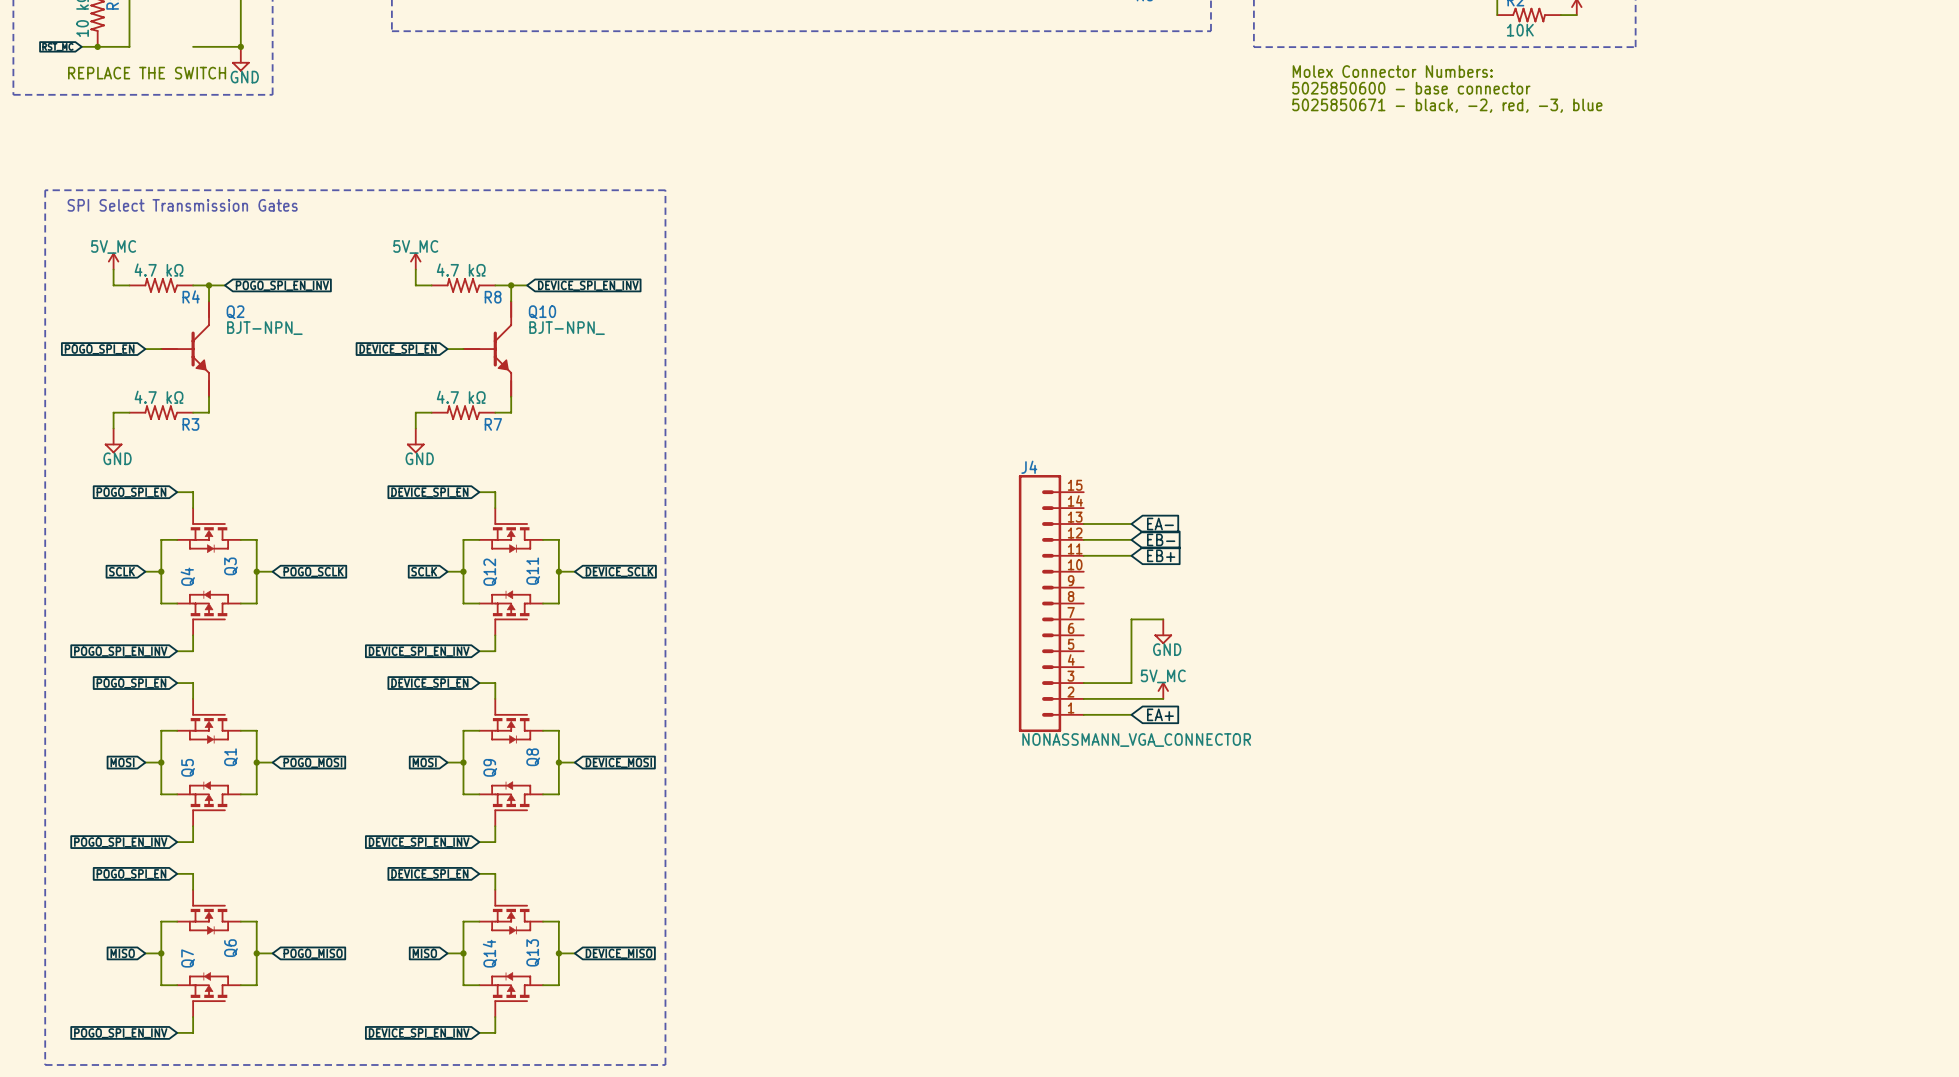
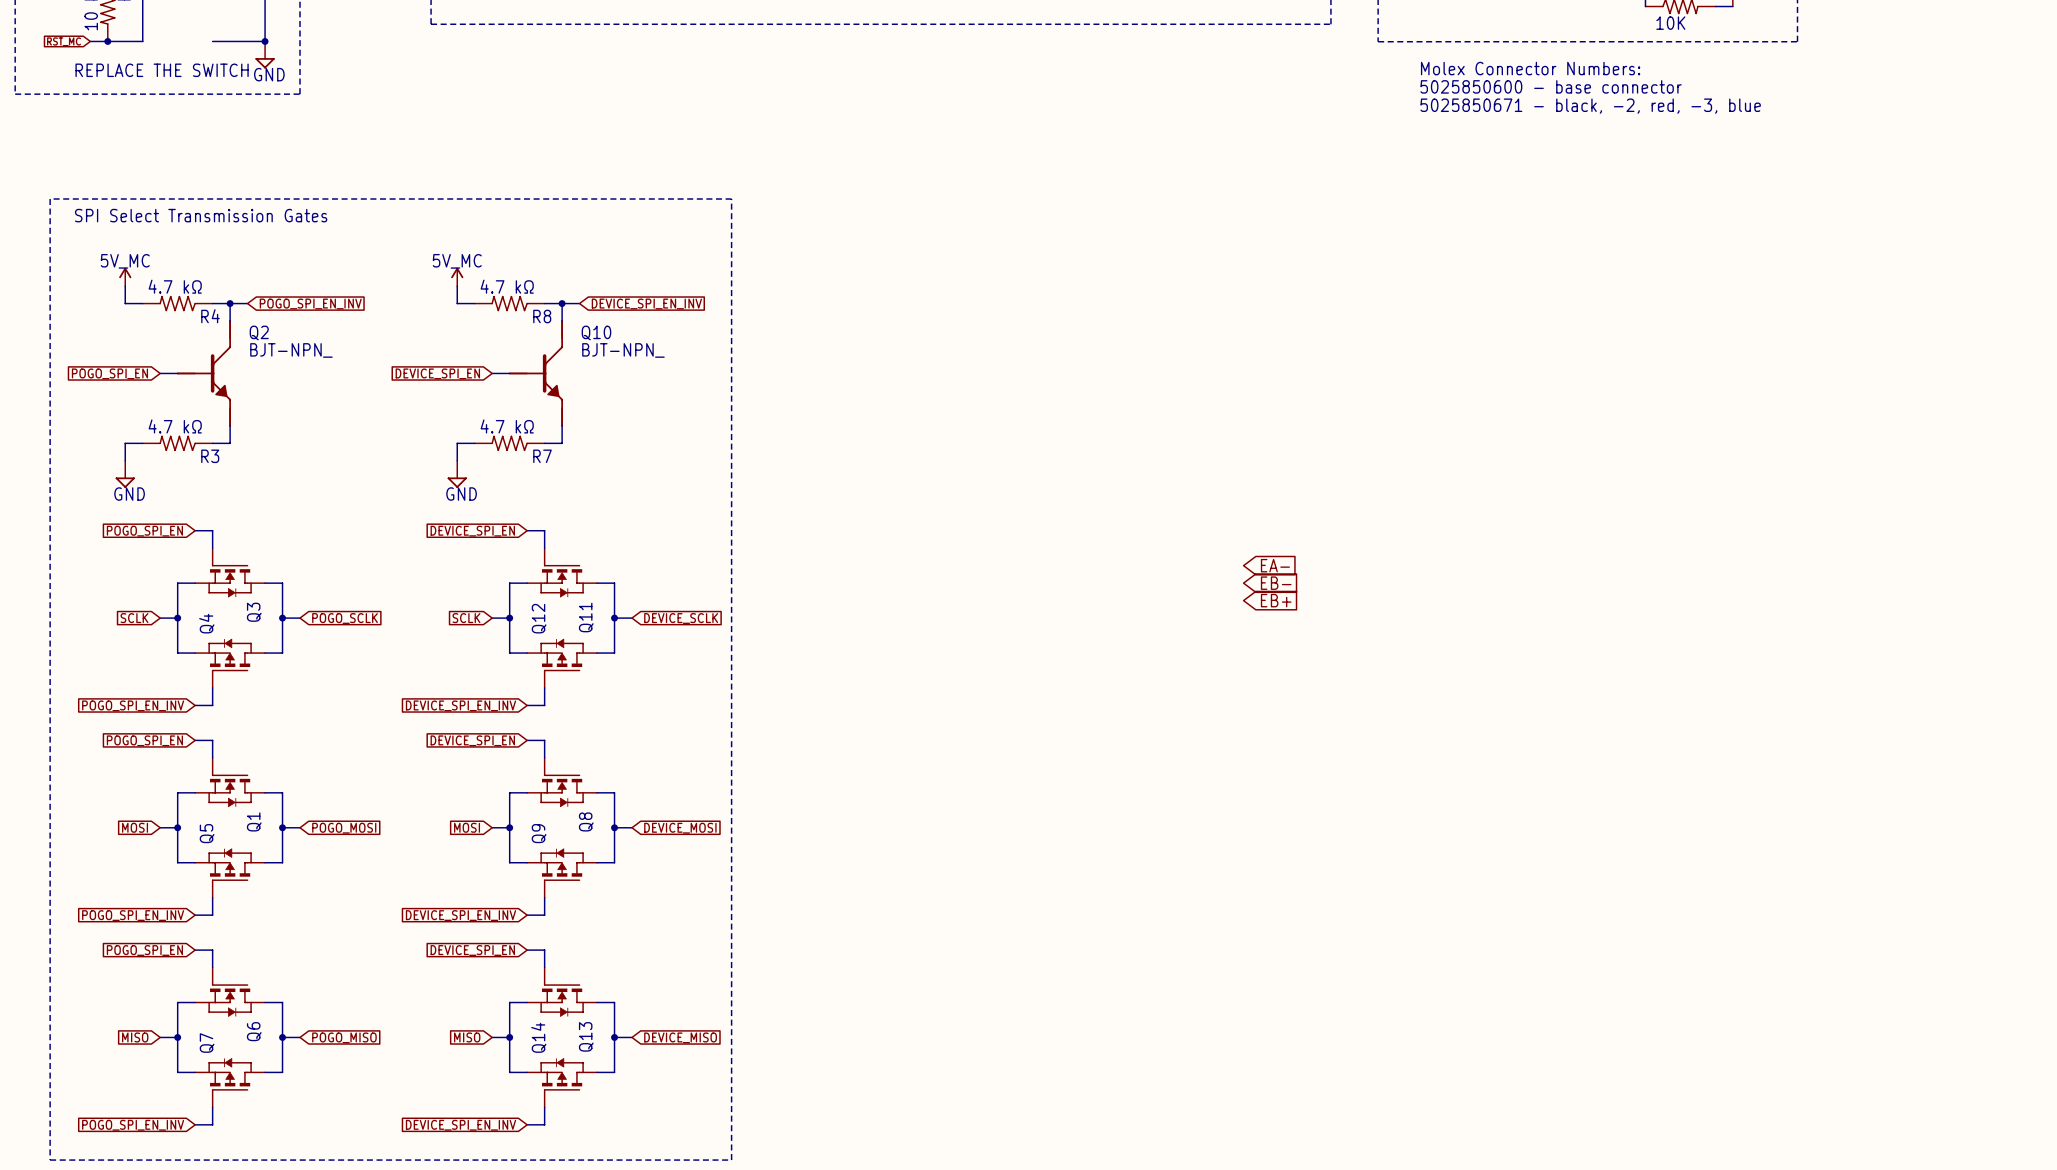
wire: (1083, 523) (1131, 523) -> none
wire: (1083, 539) (1131, 539) -> none
wire: (1083, 555) (1131, 555) -> none
J4: NONASSMANN_VGA_CONNECTOR (1051, 603) -> none
wire: (1163, 619) (1131, 619) (1131, 683) (1083, 683) -> none
power symbol: GND (1163, 631) -> none
power symbol: 5V_MC (1163, 690) -> none
wire: (1083, 698) (1163, 698) -> none
wire: (1083, 714) (1131, 714) -> none
global label: EA+ (1160, 714) -> none

